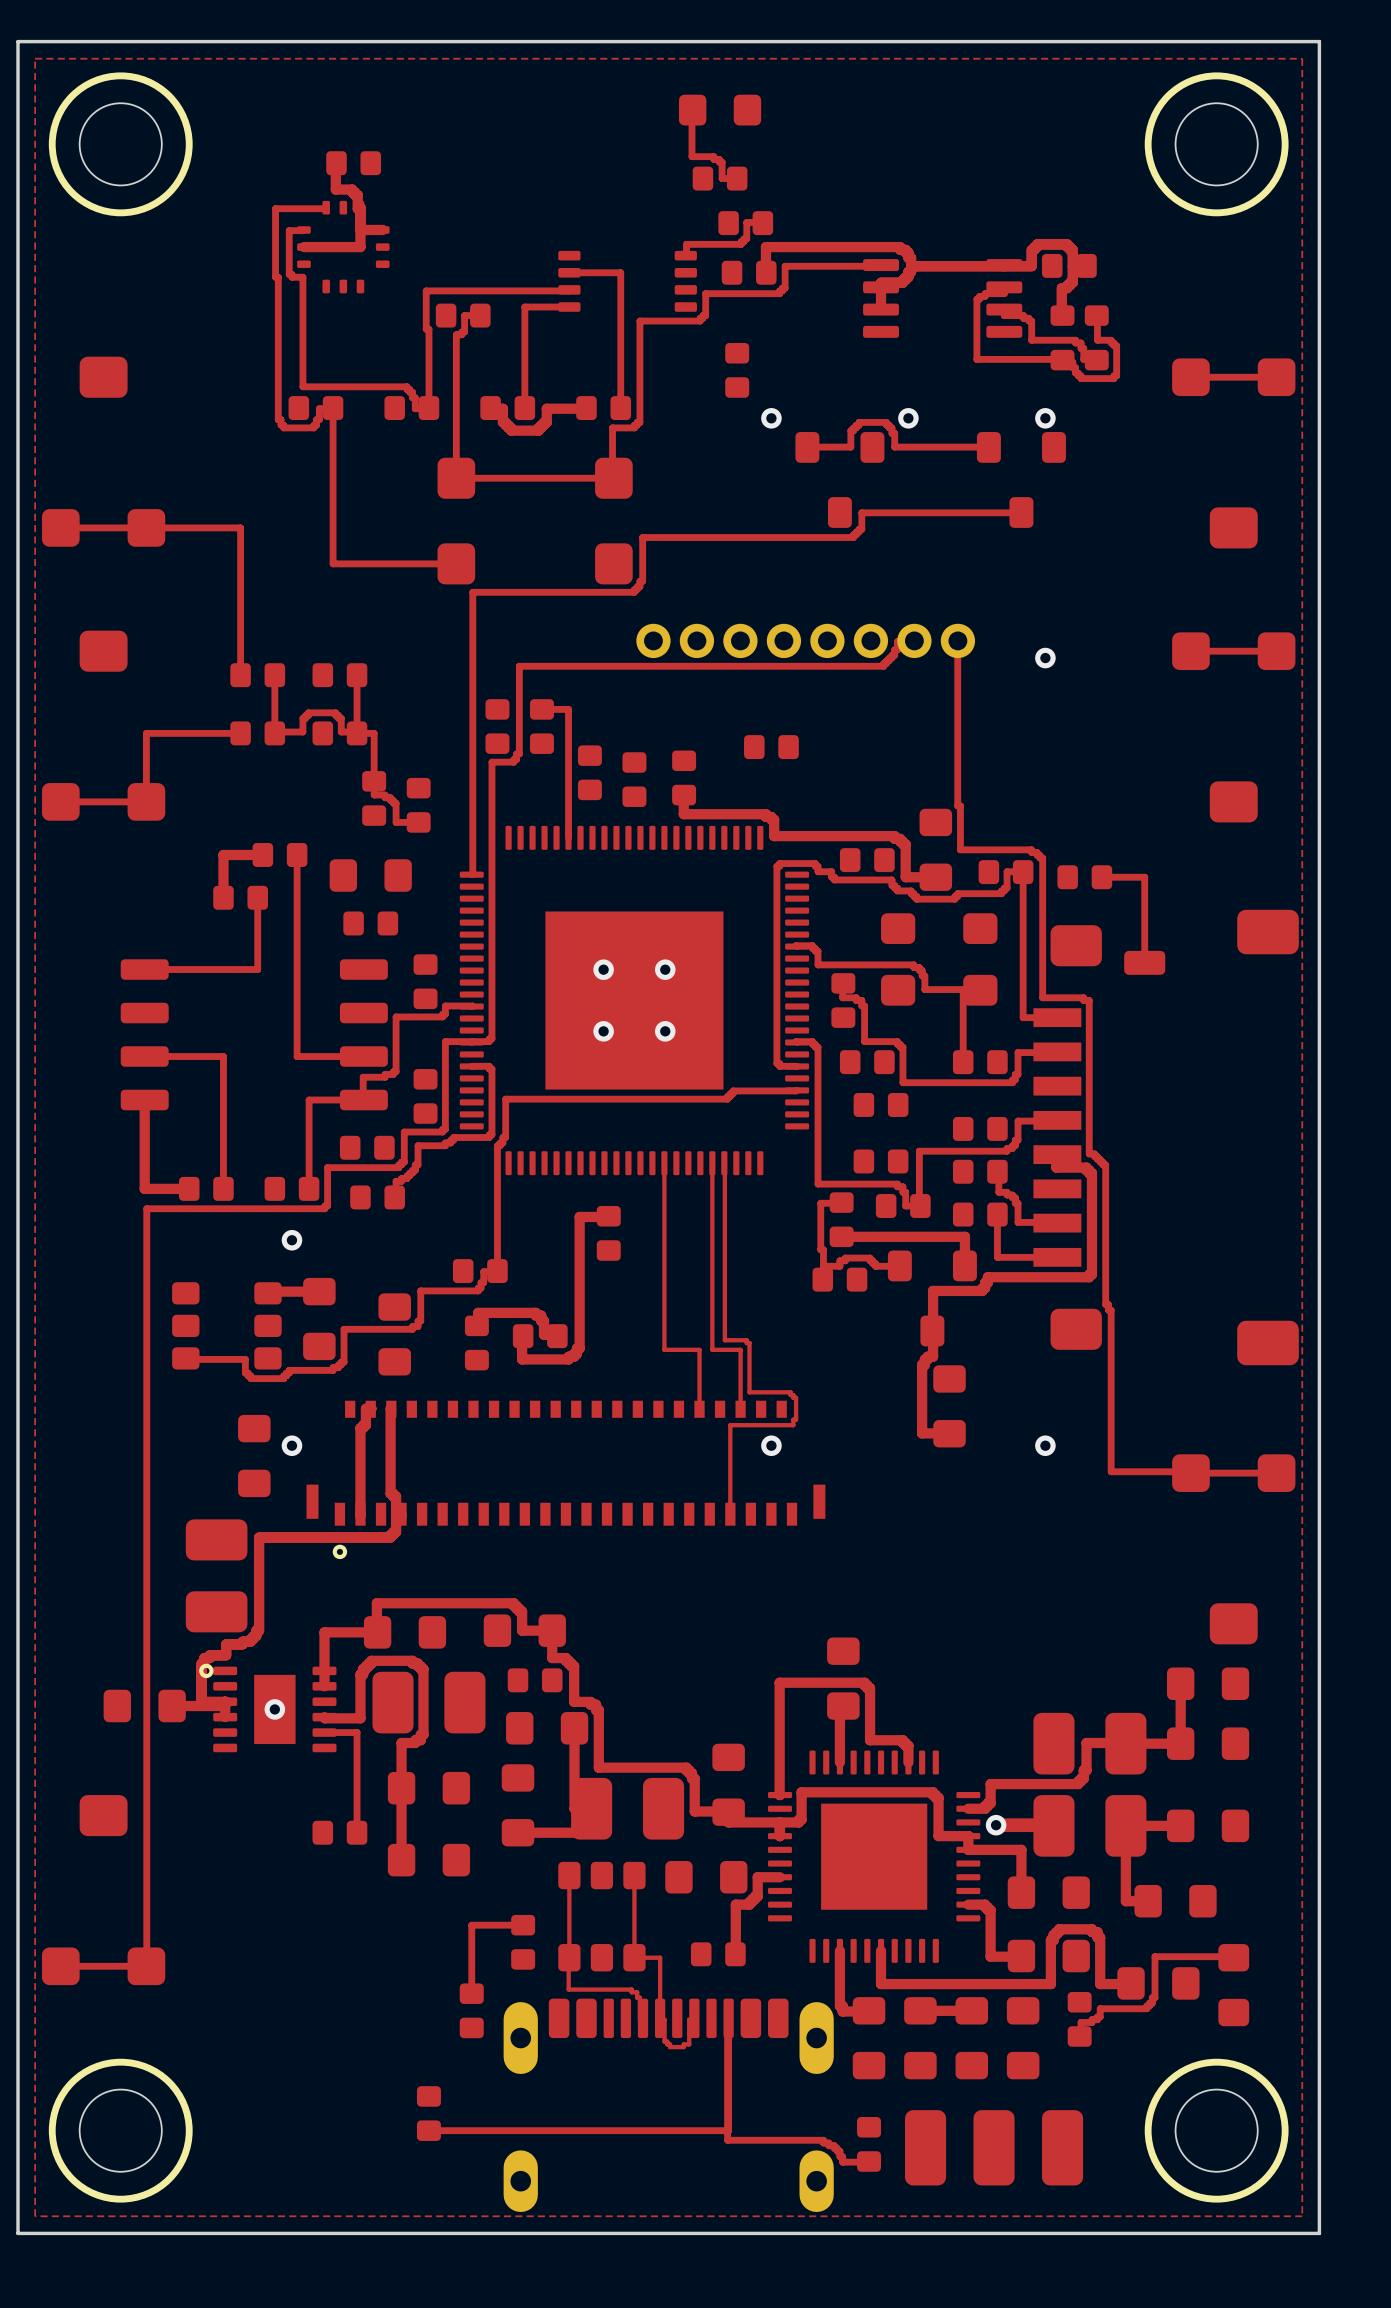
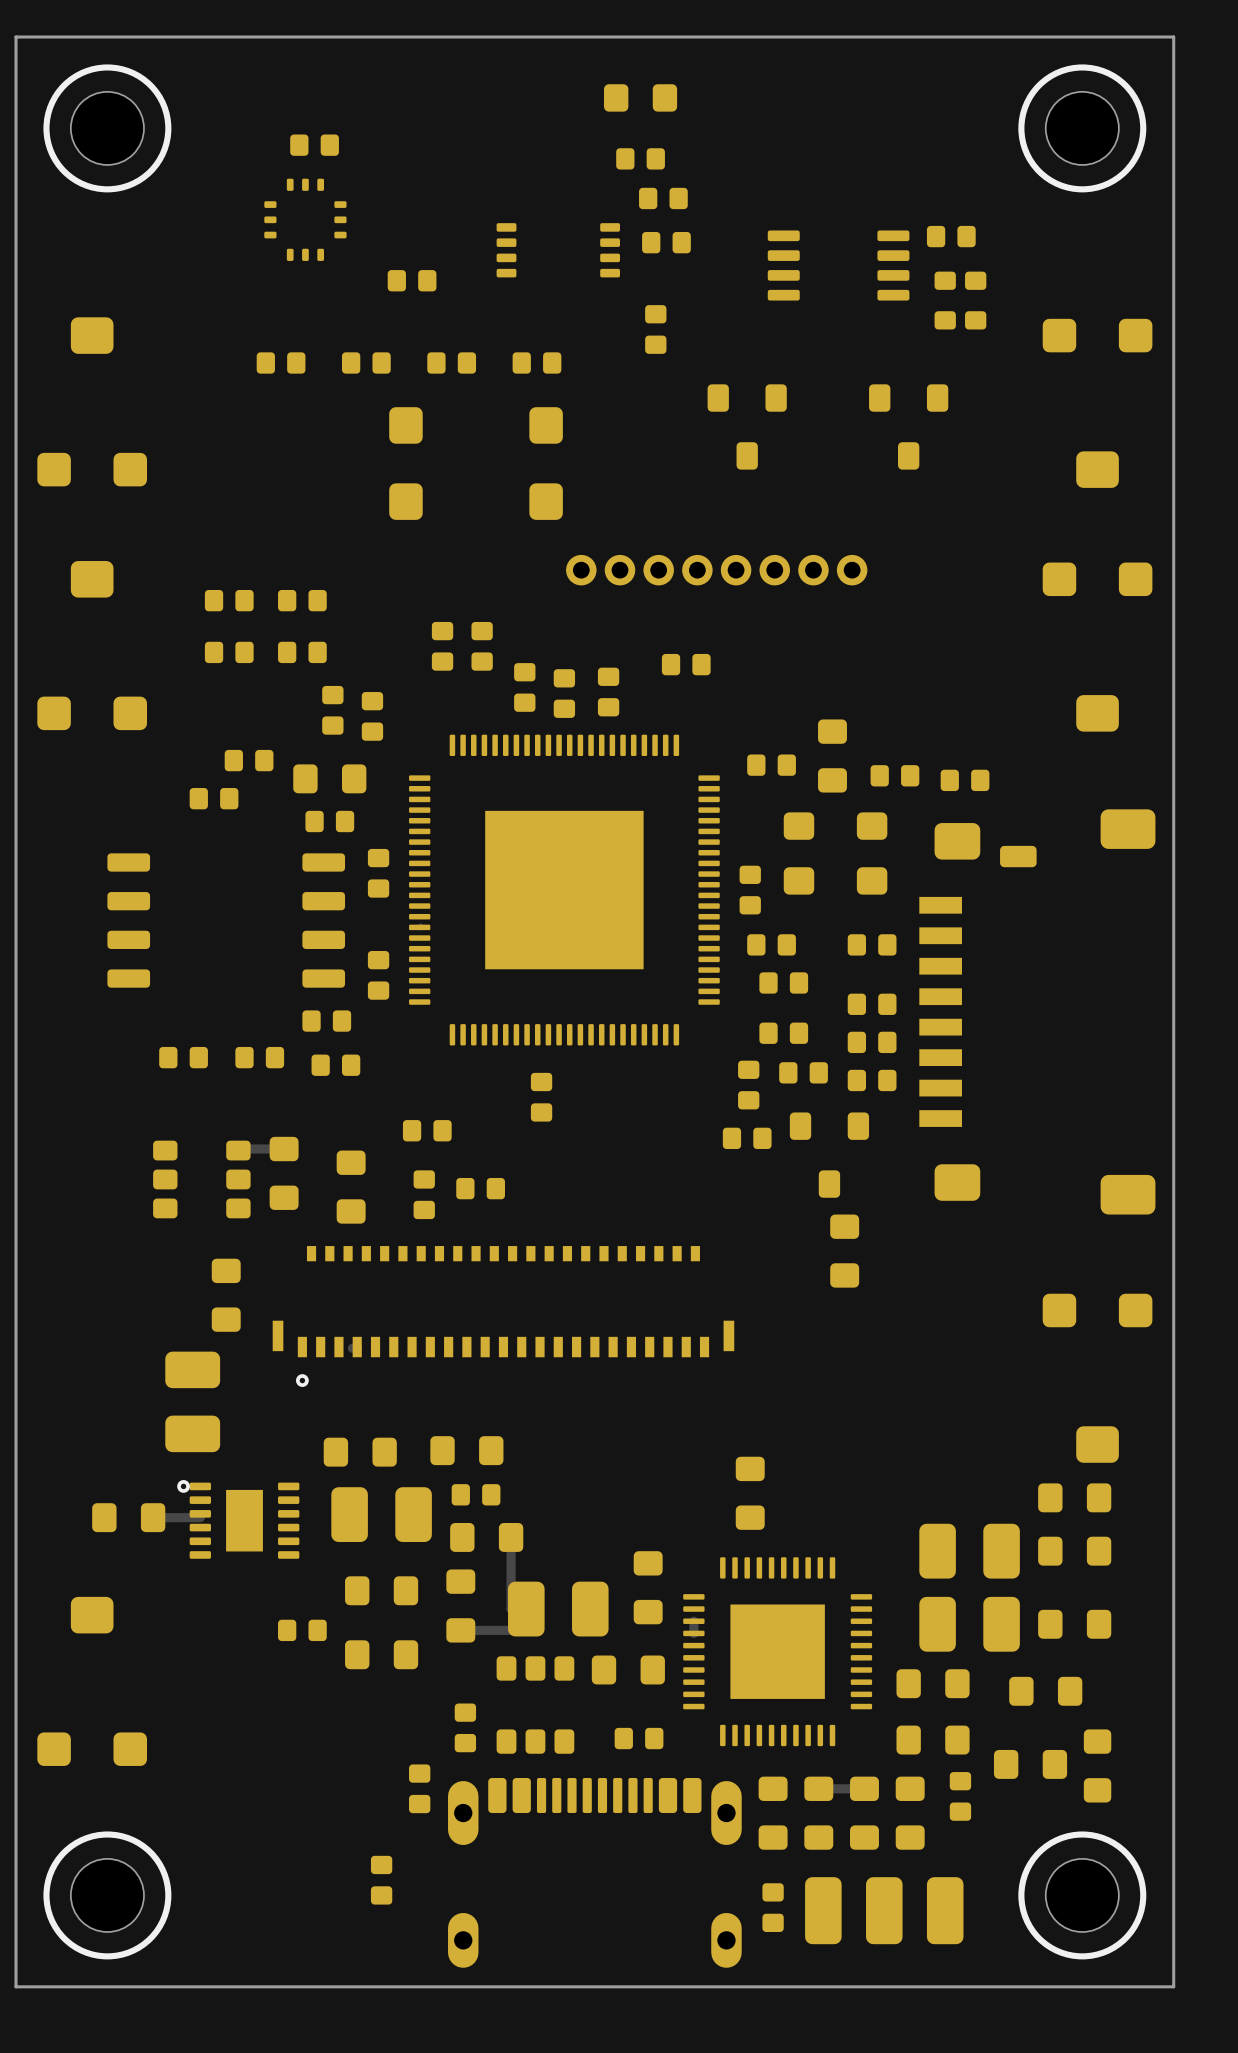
zone outline: (35, 58) (1302, 58) (1302, 2216) (35, 2216) (35, 58) -> none
track: (691, 110) (691, 156) (713, 156) (713, 159) (719, 159) (719, 162) (722, 162) (722, 178) (737, 178) -> none
track: (336, 163) (335, 189) (352, 189) (352, 192) (357, 195) (357, 208) (360, 208) -> none
track: (326, 207) (275, 208) (275, 277) (278, 277) (278, 419) (281, 419) (281, 425) (283, 425) (283, 427) (313, 427) (313, 425) (316, 425) (316, 419) (319, 419) (319, 408) (333, 408) -> none
track: (360, 207) (360, 247) (303, 247) -> none
track: (762, 223) (746, 222) (746, 238) (744, 238) (741, 244) (686, 244) (685, 255) -> none
track: (303, 229) (289, 230) (289, 274) (291, 274) (291, 277) (302, 277) (302, 386) (407, 386) (407, 389) (412, 392) (412, 397) (415, 397) (415, 408) (428, 408) (428, 329) (426, 329) (426, 290) (569, 289) -> none
track: (360, 229) (382, 229) -> none
track: (881, 265) (785, 266) (785, 288) (779, 290) (779, 293) (705, 293) (705, 315) (702, 315) (700, 321) (639, 321) (639, 422) (637, 422) (634, 427) (612, 427) (613, 478) (456, 478) (456, 334) (461, 334) (461, 332) (464, 332) (464, 315) (481, 315) -> none
track: (911, 266) (1031, 266) (1031, 249) (1037, 247) (1037, 244) (1067, 244) (1070, 249) (1072, 249) (1072, 282) (1070, 282) (1067, 288) (1061, 288) (1061, 315) -> none
track: (569, 272) (620, 272) (620, 408) -> none
track: (766, 272) (765, 247) (900, 247) (900, 249) (905, 249) (905, 252) (908, 252) (908, 258) (911, 258) (911, 271) (908, 271) (908, 277) (902, 279) (902, 282) (881, 282) (881, 309) -> none
track: (1004, 287) (1004, 293) (985, 293) (985, 296) (979, 296) (979, 299) (976, 299) (976, 359) (1070, 359) (1070, 362) (1072, 362) (1072, 367) (1075, 367) (1075, 373) (1078, 373) (1081, 378) (1113, 378) (1113, 375) (1116, 375) (1116, 345) (1113, 345) (1111, 340) (1097, 340) (1097, 315) -> none
track: (569, 307) (524, 307) (524, 408) -> none
track: (1004, 309) (1004, 315) (1023, 315) (1023, 318) (1028, 318) (1028, 321) (1031, 321) (1031, 340) (1075, 340) (1075, 342) (1081, 342) (1081, 348) (1083, 348) (1083, 359) (1096, 360) -> none
track: (1190, 377) (1276, 377) -> none
track: (333, 408) (333, 563) (456, 563) -> none
track: (490, 408) (489, 408) (502, 408) (502, 422) (505, 422) (505, 425) (511, 427) (511, 430) (538, 430) (538, 427) (541, 427) (544, 422) (546, 422) (546, 408) (587, 408) (586, 408) -> none
via: (771, 418) -> none
via: (908, 418) -> none
via: (1045, 418) -> none
track: (807, 447) (850, 447) (850, 430) (856, 427) (859, 422) (886, 422) (886, 425) (891, 427) (891, 433) (894, 433) (894, 447) (988, 447) -> none
track: (1021, 512) (861, 512) (861, 529) (859, 529) (859, 532) (853, 534) (853, 537) (642, 537) (642, 581) (639, 581) (639, 586) (637, 586) (634, 592) (472, 592) (471, 874) -> none
track: (60, 527) (240, 527) (240, 675) -> none
track: (914, 640) (897, 641) (897, 649) (894, 649) (894, 655) (891, 655) (889, 660) (886, 660) (883, 666) (519, 666) (519, 753) (516, 753) (516, 759) (513, 759) (513, 762) (491, 762) (491, 1038) (489, 1038) (489, 1041) (445, 1041) (445, 1129) (442, 1129) (442, 1132) (404, 1132) (404, 1162) (398, 1164) (398, 1167) (327, 1167) (327, 1206) (324, 1206) (324, 1208) (146, 1208) (146, 1964) (60, 1966) -> none
track: (957, 640) (957, 806) (960, 806) (960, 849) (1031, 849) (1031, 852) (1037, 852) (1037, 855) (1042, 858) (1042, 997) (1083, 997) (1083, 1000) (1089, 1000) (1089, 1153) (1094, 1153) (1094, 1156) (1100, 1159) (1102, 1164) (1105, 1164) (1105, 1304) (1108, 1304) (1108, 1310) (1111, 1310) (1111, 1471) (1276, 1473) -> none
track: (1190, 651) (1276, 651) -> none
via: (1045, 658) -> none
track: (274, 675) (274, 733) (302, 732) (302, 718) (305, 718) (308, 712) (335, 712) (338, 718) (341, 718) (341, 732) (357, 732) (357, 733) -> none
track: (357, 675) (357, 733) -> none
track: (541, 709) (568, 709) (568, 837) -> none
track: (240, 733) (146, 733) (146, 801) (60, 801) -> none
track: (357, 733) (374, 733) (374, 795) (385, 795) (385, 797) (390, 797) (390, 800) (396, 803) (396, 822) (418, 822) -> none
track: (683, 795) (683, 814) (765, 814) (765, 816) (771, 816) (771, 819) (774, 819) (774, 836) (894, 836) (894, 838) (900, 838) (902, 844) (905, 844) (905, 877) (935, 877) -> none
track: (262, 854) (223, 854) (223, 897) -> none
track: (297, 854) (297, 1056) (363, 1056) -> none
track: (1023, 871) (1007, 871) (1007, 888) (1004, 888) (1001, 893) (957, 893) (954, 899) (916, 899) (916, 896) (913, 896) (911, 890) (897, 890) (897, 888) (891, 885) (891, 879) (834, 879) (834, 877) (831, 877) (831, 871) (818, 871) (818, 866) (815, 866) (815, 863) (779, 863) (779, 866) (776, 866) (776, 1063) (779, 1063) (779, 1066) (797, 1066) -> none
track: (1023, 872) (1023, 1017) (1057, 1017) -> none
track: (1101, 877) (1144, 877) (1144, 962) -> none
track: (257, 897) (257, 969) (144, 969) -> none
track: (797, 946) (812, 945) (812, 948) (818, 951) (818, 964) (913, 964) (913, 967) (919, 967) (919, 970) (922, 970) (922, 975) (924, 975) (924, 989) (979, 989) (963, 990) (963, 1062) -> none
via: (603, 969) -> none
via: (665, 969) -> none
track: (843, 983) (842, 997) (856, 997) (856, 1000) (861, 1000) (861, 1006) (864, 1006) (864, 1041) (897, 1041) (897, 1044) (902, 1047) (902, 1082) (1012, 1082) (1012, 1079) (1015, 1079) (1015, 1074) (1018, 1074) (1018, 1052) (1057, 1051) -> none
track: (471, 1006) (445, 1006) (445, 1014) (442, 1014) (442, 1016) (396, 1016) (396, 1071) (393, 1071) (393, 1074) (385, 1074) (385, 1077) (363, 1077) (363, 1100) (309, 1100) (309, 1188) -> none
via: (603, 1031) -> none
via: (665, 1031) -> none
track: (797, 1042) (812, 1041) (812, 1044) (818, 1047) (818, 1184) (897, 1184) (897, 1186) (902, 1186) (902, 1192) (905, 1192) (905, 1206) (920, 1206) -> none
track: (144, 1056) (223, 1056) (223, 1188) -> none
track: (471, 1066) (489, 1066) (489, 1069) (491, 1069) (491, 1134) (489, 1134) (489, 1137) (453, 1137) (450, 1142) (445, 1142) (445, 1145) (418, 1145) (418, 1164) (415, 1164) (415, 1170) (412, 1170) (412, 1173) (407, 1175) (407, 1178) (396, 1181) (394, 1197) -> none
track: (797, 1090) (733, 1090) (733, 1093) (730, 1093) (727, 1099) (505, 1099) (505, 1137) (502, 1137) (502, 1142) (497, 1145) (497, 1271) (483, 1271) (483, 1282) (481, 1282) (481, 1288) (478, 1288) (478, 1290) (420, 1290) (420, 1321) (418, 1321) (418, 1326) (412, 1326) (412, 1329) (344, 1329) (344, 1362) (341, 1362) (338, 1367) (333, 1367) (333, 1370) (289, 1370) (289, 1373) (286, 1373) (283, 1378) (250, 1378) (250, 1375) (245, 1373) (245, 1359) (185, 1358) -> none
track: (144, 1100) (144, 1188) (189, 1188) -> none
track: (1057, 1120) (1018, 1121) (1018, 1140) (1015, 1140) (1015, 1145) (1012, 1145) (1012, 1148) (1007, 1148) (1007, 1151) (919, 1151) (919, 1206) -> none
track: (1057, 1154) (1056, 1167) (1086, 1167) (1086, 1170) (1091, 1173) (1091, 1274) (1089, 1274) (1089, 1277) (987, 1277) (987, 1282) (985, 1282) (985, 1288) (982, 1288) (982, 1290) (933, 1290) (933, 1356) (927, 1356) (927, 1359) (924, 1359) (924, 1364) (922, 1364) (922, 1433) (949, 1433) -> none
track: (664, 1163) (664, 1349) (699, 1349) (699, 1409) -> none
track: (712, 1163) (712, 1349) (740, 1349) (740, 1409) -> none
track: (724, 1163) (724, 1340) (746, 1340) (746, 1342) (749, 1342) (749, 1392) (790, 1392) (790, 1395) (796, 1397) (796, 1419) (793, 1419) (793, 1425) (730, 1425) (730, 1515) -> none
track: (997, 1171) (998, 1170) (998, 1192) (1007, 1192) (1007, 1195) (1012, 1195) (1012, 1197) (1015, 1197) (1015, 1203) (1018, 1203) (1018, 1222) (1057, 1223) -> none
track: (841, 1202) (820, 1203) (822, 1279) -> none
track: (997, 1214) (997, 1257) (1057, 1257) -> none
track: (608, 1216) (579, 1216) (579, 1348) (576, 1348) (576, 1353) (574, 1353) (574, 1356) (568, 1356) (568, 1359) (522, 1359) (522, 1334) (523, 1336) -> none
track: (841, 1236) (964, 1236) (964, 1265) -> none
via: (291, 1240) -> none
track: (823, 1266) (839, 1266) (839, 1260) (845, 1260) (845, 1258) (870, 1258) (870, 1260) (872, 1260) (875, 1266) (900, 1266) -> none
track: (476, 1325) (478, 1326) (478, 1312) (535, 1312) (535, 1315) (541, 1315) (541, 1321) (544, 1321) (544, 1334) (557, 1336) -> none
track: (370, 1409) (365, 1408) (365, 1425) (360, 1427) (360, 1515) -> none
track: (391, 1409) (390, 1493) (396, 1496) (396, 1532) (390, 1534) (390, 1537) (259, 1537) (259, 1630) (256, 1630) (256, 1636) (253, 1636) (250, 1641) (242, 1641) (242, 1644) (226, 1644) (226, 1655) (209, 1655) (209, 1658) (204, 1658) (204, 1663) (201, 1663) (201, 1701) (226, 1701) (225, 1717) -> none
via: (291, 1445) -> none
via: (771, 1445) -> none
via: (1045, 1445) -> none
track: (1180, 1683) (1180, 1743) (1086, 1743) (1086, 1770) (1083, 1770) (1083, 1778) (1078, 1781) (1078, 1784) (990, 1784) (990, 1803) (987, 1803) (985, 1808) (968, 1808) -> none
track: (324, 1686) (324, 1632) (376, 1633) (376, 1603) (513, 1603) (513, 1606) (519, 1608) (519, 1611) (522, 1611) (522, 1630) (552, 1630) (552, 1658) (565, 1658) (568, 1663) (574, 1666) (574, 1701) (590, 1701) (590, 1704) (596, 1704) (596, 1710) (598, 1710) (598, 1767) (686, 1767) (689, 1773) (691, 1773) (691, 1778) (694, 1778) (694, 1811) (727, 1811) (728, 1822) (798, 1822) (798, 1819) (801, 1819) (801, 1792) (933, 1792) (933, 1795) (938, 1797) (938, 1836) (968, 1836) -> none
track: (843, 1706) (839, 1706) (839, 1762) -> none
via: (274, 1709) -> none
track: (324, 1717) (360, 1718) (360, 1674) (363, 1674) (363, 1669) (365, 1669) (365, 1666) (368, 1666) (371, 1660) (412, 1660) (412, 1663) (418, 1663) (420, 1669) (423, 1669) (423, 1734) (420, 1734) (420, 1740) (415, 1740) (415, 1743) (401, 1743) (401, 1860) -> none
track: (324, 1732) (357, 1732) (357, 1832) -> none
track: (908, 1762) (908, 1745) (902, 1743) (902, 1740) (870, 1740) (870, 1688) (864, 1685) (864, 1682) (779, 1682) (779, 1795) -> none
track: (996, 1825) (1053, 1825) -> none
via: (996, 1825) -> none
track: (1180, 1825) (1125, 1825) (1125, 1901) (1148, 1901) -> none
track: (968, 1836) (968, 1849) (1021, 1849) (1021, 1892) -> none
track: (569, 1875) (568, 1989) (631, 1989) (631, 1992) (637, 1992) (637, 1997) (639, 1997) (639, 2019) (643, 2018) -> none
track: (634, 1875) (634, 1957) (660, 1957) (659, 2019) (664, 2019) (664, 2041) (670, 2044) (670, 2047) (683, 2047) (683, 2044) (689, 2044) (689, 2019) (694, 2018) -> none
track: (779, 1877) (757, 1877) (757, 1896) (754, 1896) (754, 1899) (749, 1901) (749, 1904) (735, 1904) (735, 1953) -> none
track: (968, 1904) (985, 1904) (987, 1910) (990, 1910) (990, 1956) (1021, 1956) -> none
track: (523, 1925) (471, 1925) (471, 1993) -> none
track: (839, 1950) (839, 2006) (842, 2006) (842, 2011) (869, 2010) -> none
track: (881, 1950) (881, 1984) (1050, 1984) (1050, 1940) (1053, 1940) (1053, 1934) (1059, 1932) (1059, 1929) (1091, 1929) (1091, 1932) (1097, 1932) (1097, 1937) (1100, 1937) (1100, 1984) (1131, 1983) -> none
track: (1233, 1957) (1155, 1956) (1155, 1997) (1152, 1997) (1152, 2003) (1149, 2003) (1146, 2008) (1100, 2008) (1100, 2016) (1097, 2016) (1097, 2019) (1091, 2019) (1091, 2022) (1081, 2022) (1079, 2036) -> none
track: (428, 2130) (728, 2130) (728, 2018) (727, 2019) (727, 2140) (823, 2140) (823, 2143) (834, 2145) (834, 2148) (839, 2151) (842, 2162) (869, 2161) -> none

